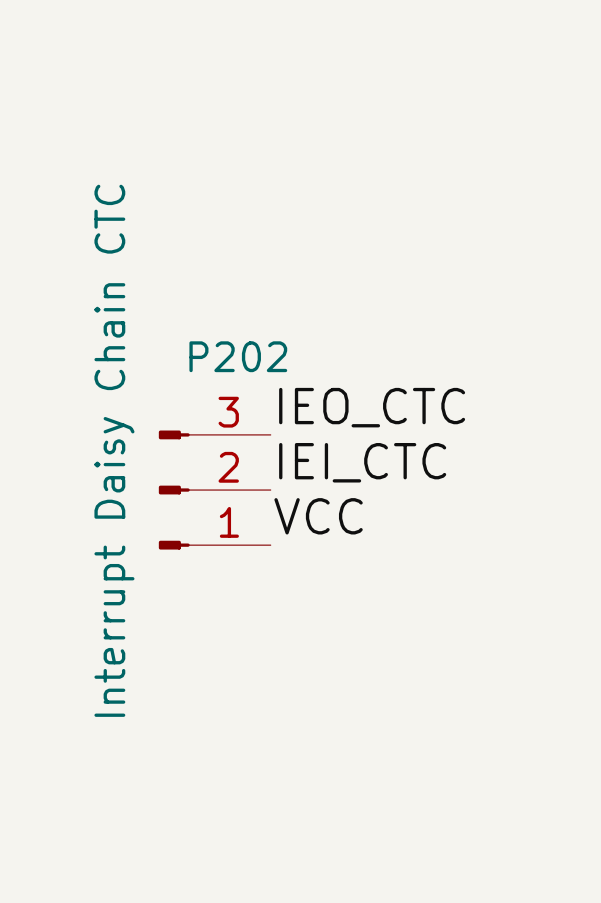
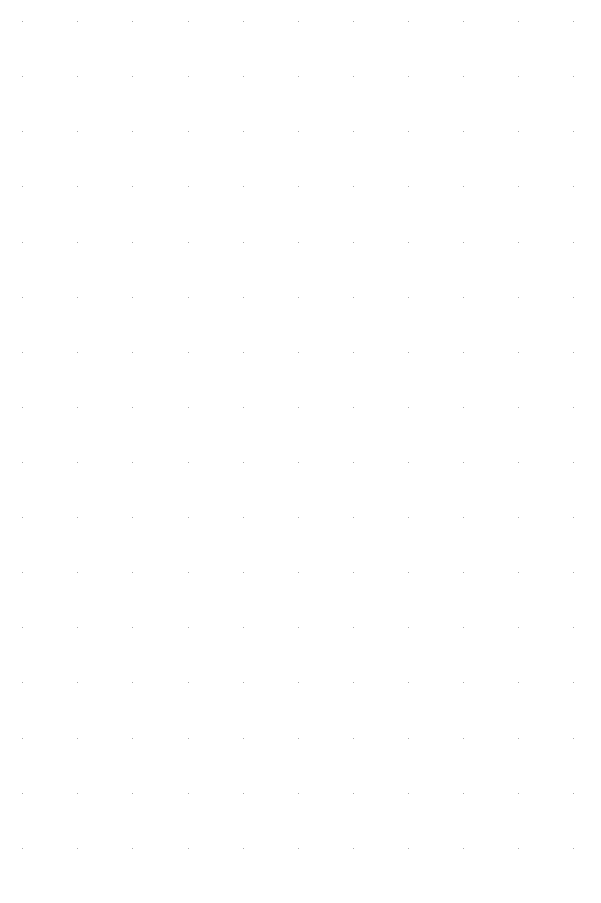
label: IEO_CTC (372, 407) -> none
label: IEI_CTC (362, 462) -> none
P202: Interrupt Daisy Chain CTC (214, 490) -> none
label: VCC (318, 516) -> none

